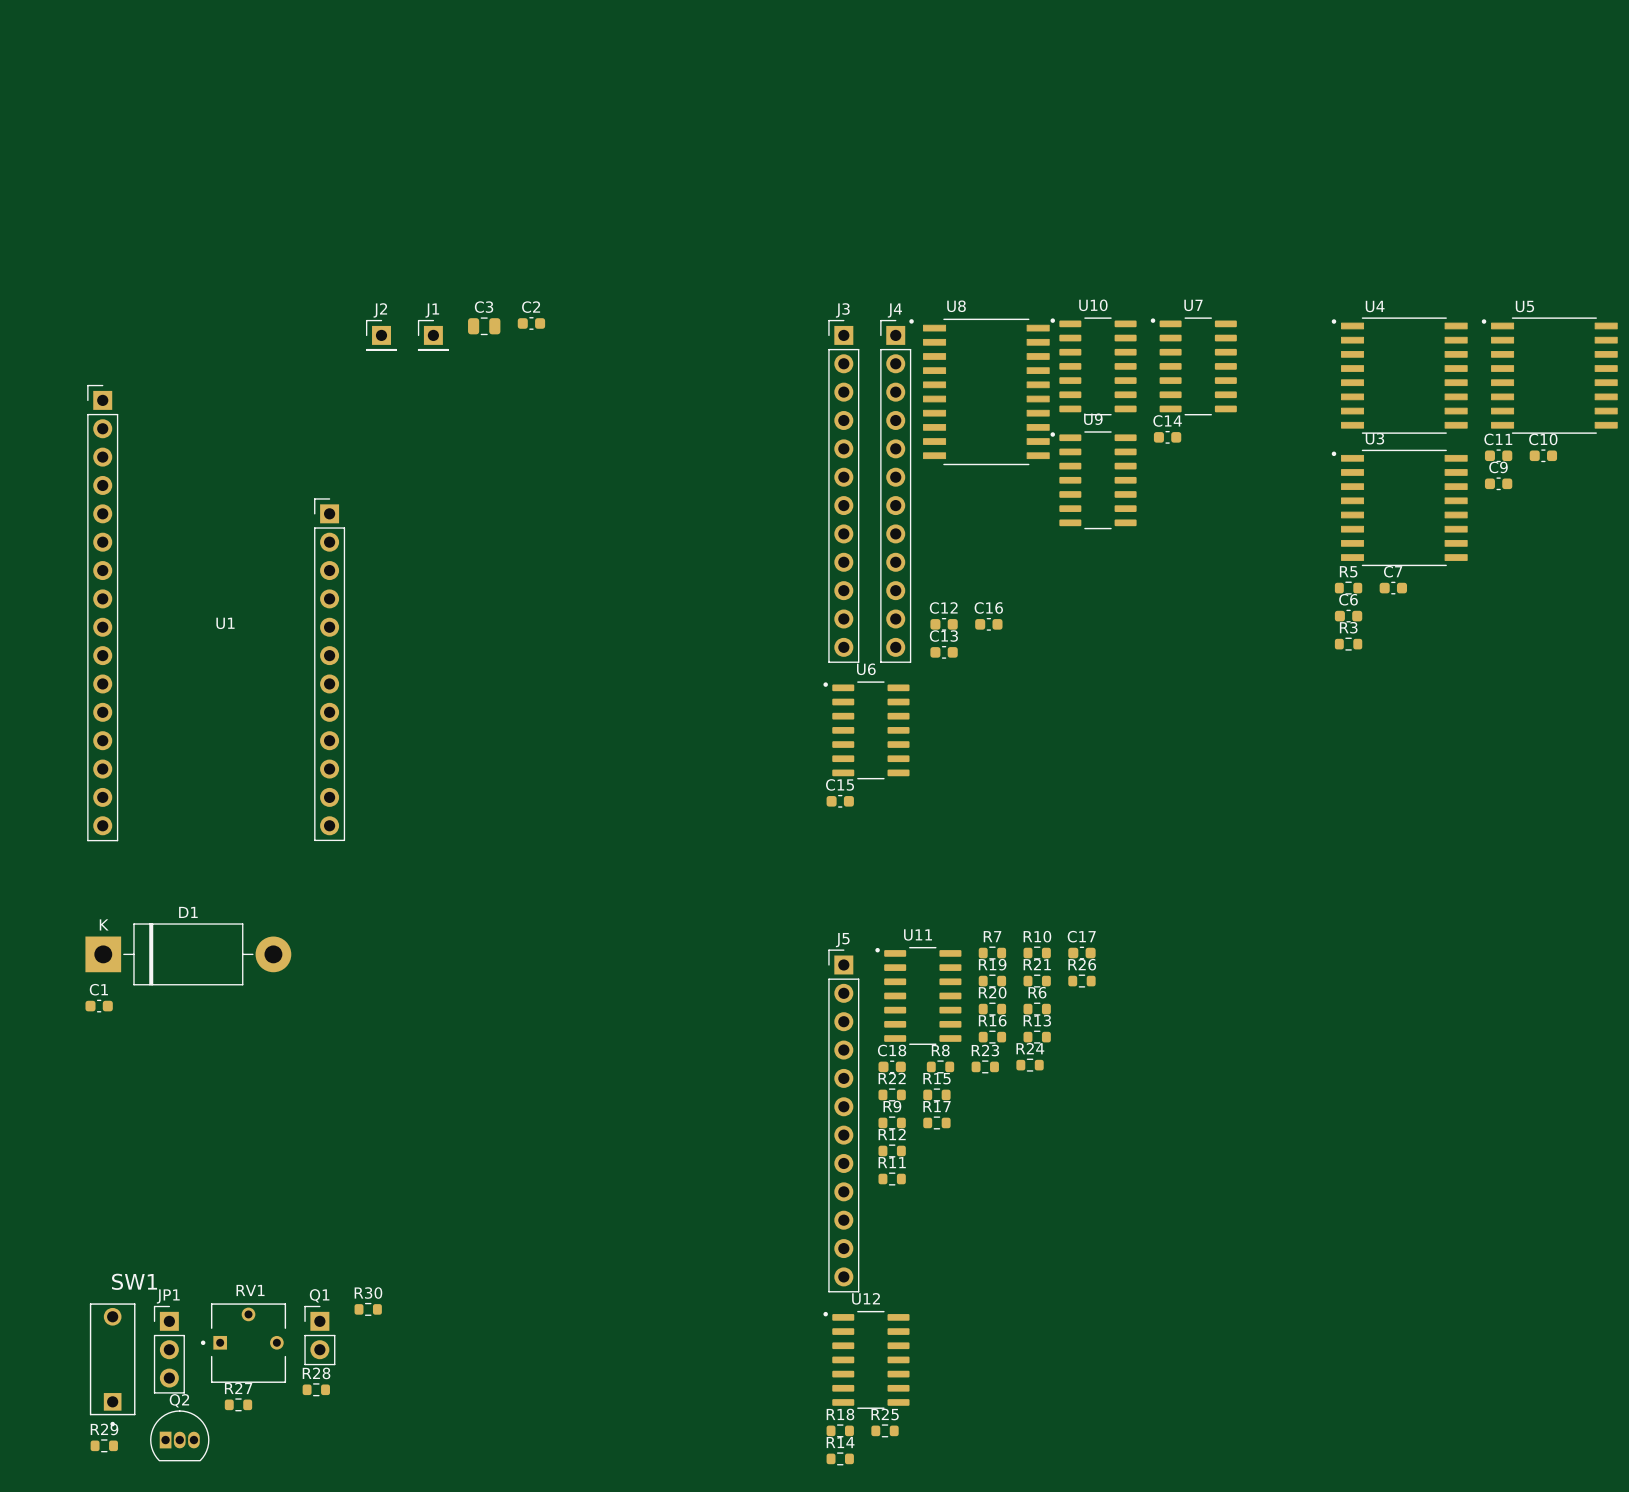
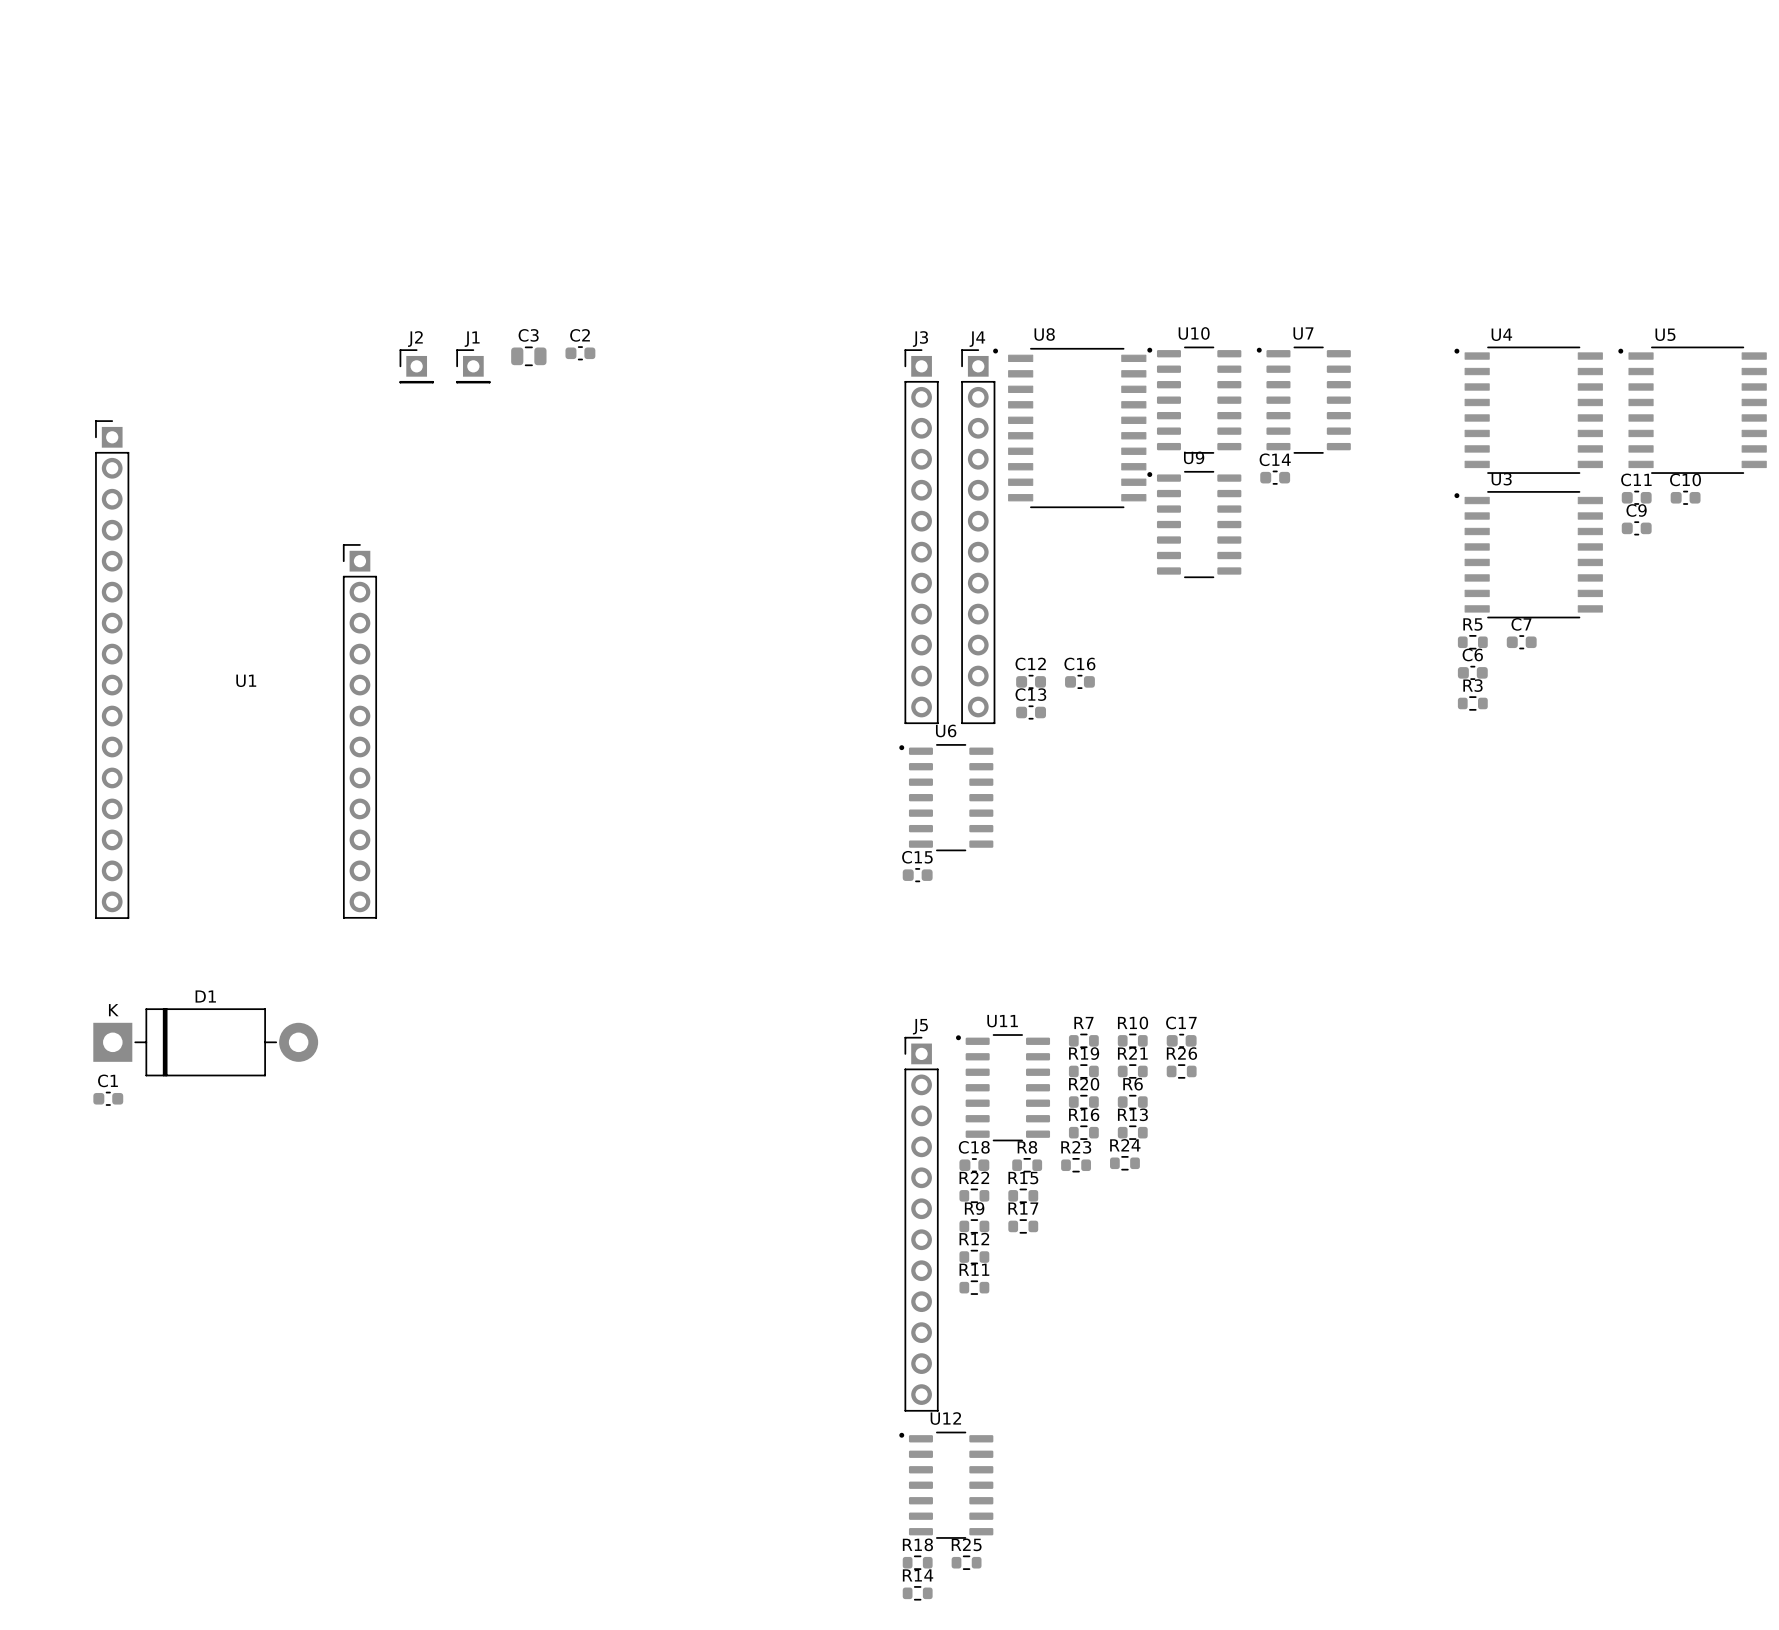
R30: (368, 1309) -> none
Q1: (319, 1335) -> none
RV1: (243, 1343) -> none
JP1: (169, 1349) -> none
SW1: (112, 1364) -> none
R28: (316, 1389) -> none
R27: (238, 1404) -> none
Q2: (179, 1435) -> none
R29: (104, 1445) -> none

